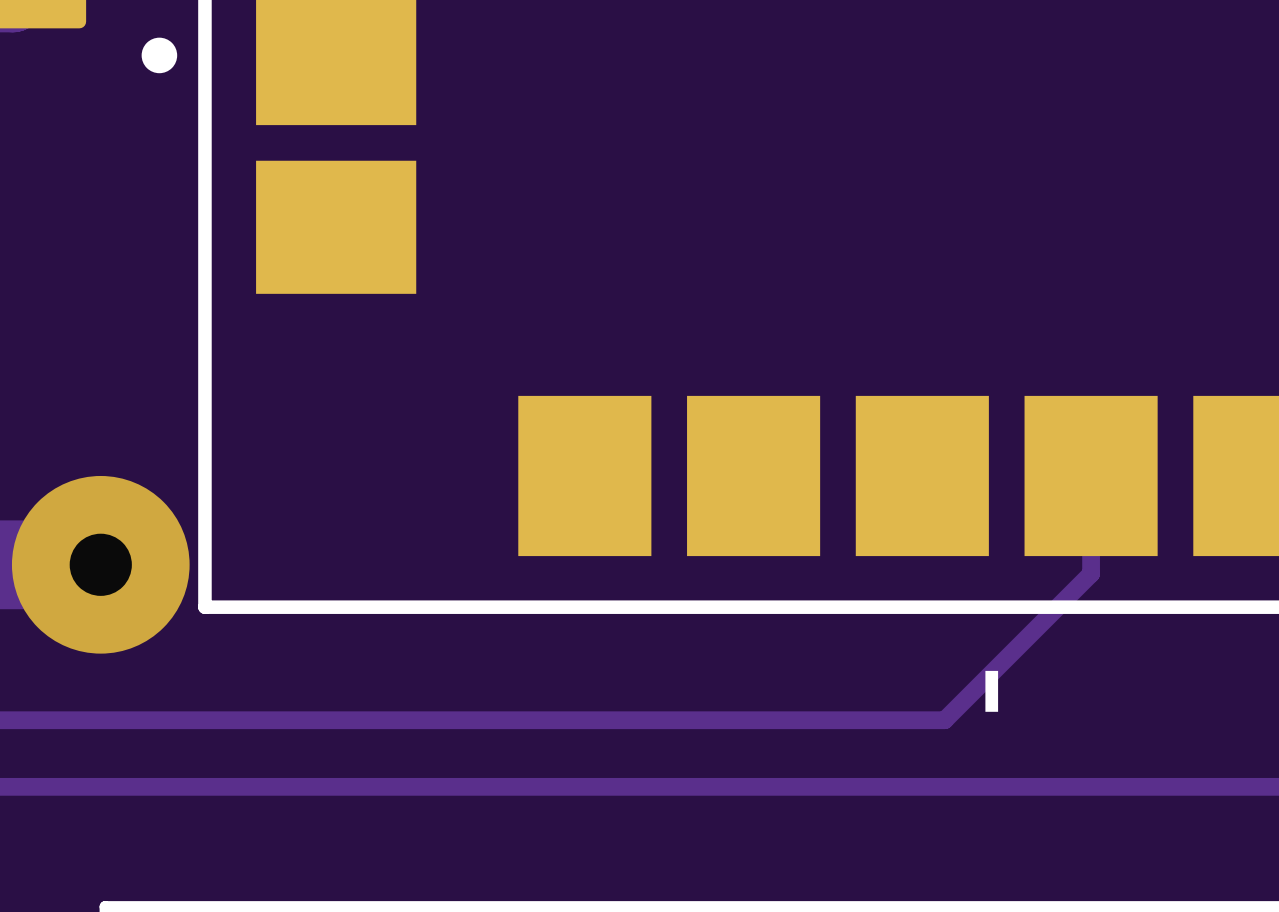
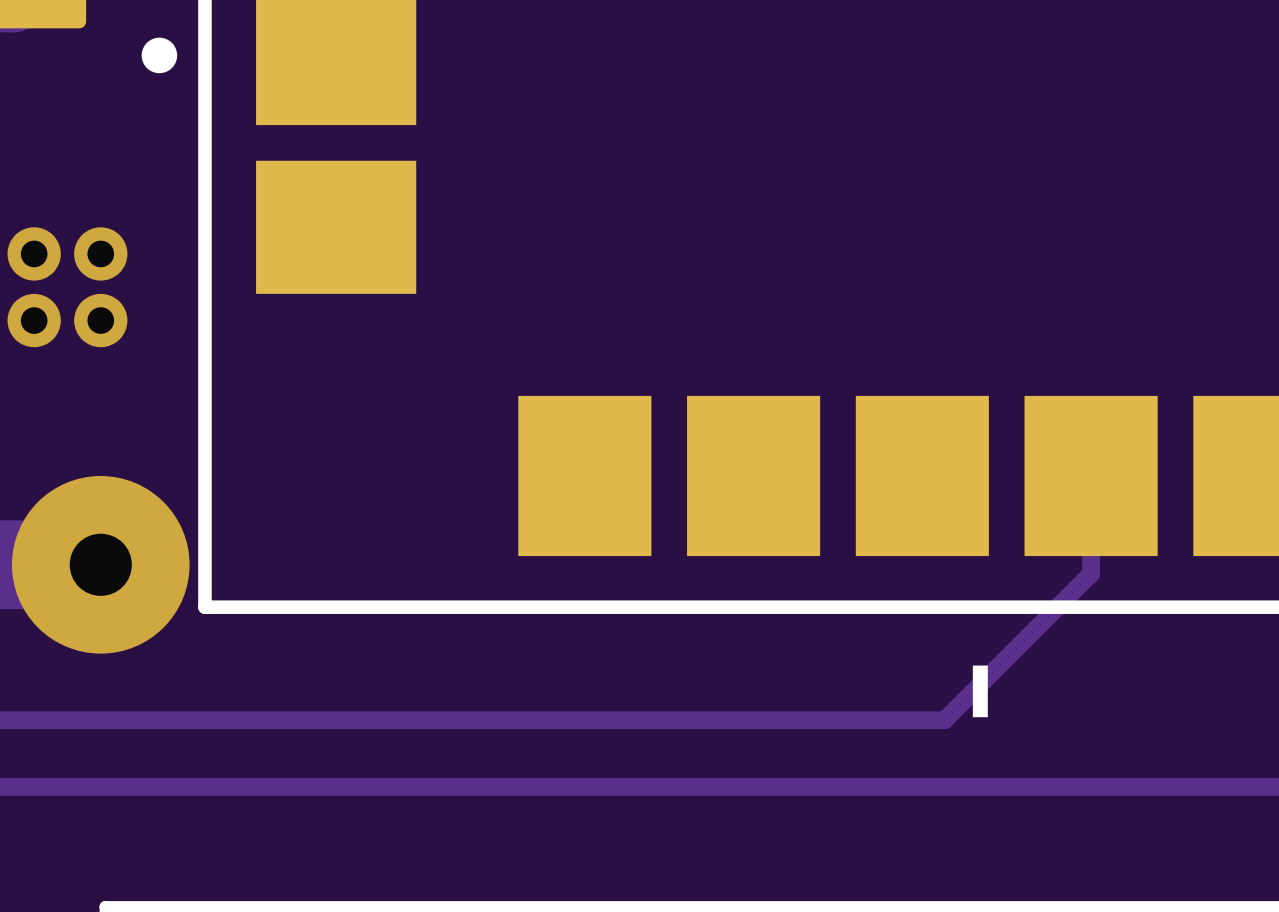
via: none -> (34, 253)
via: none -> (100, 253)
via: none -> (34, 320)
via: none -> (100, 320)

